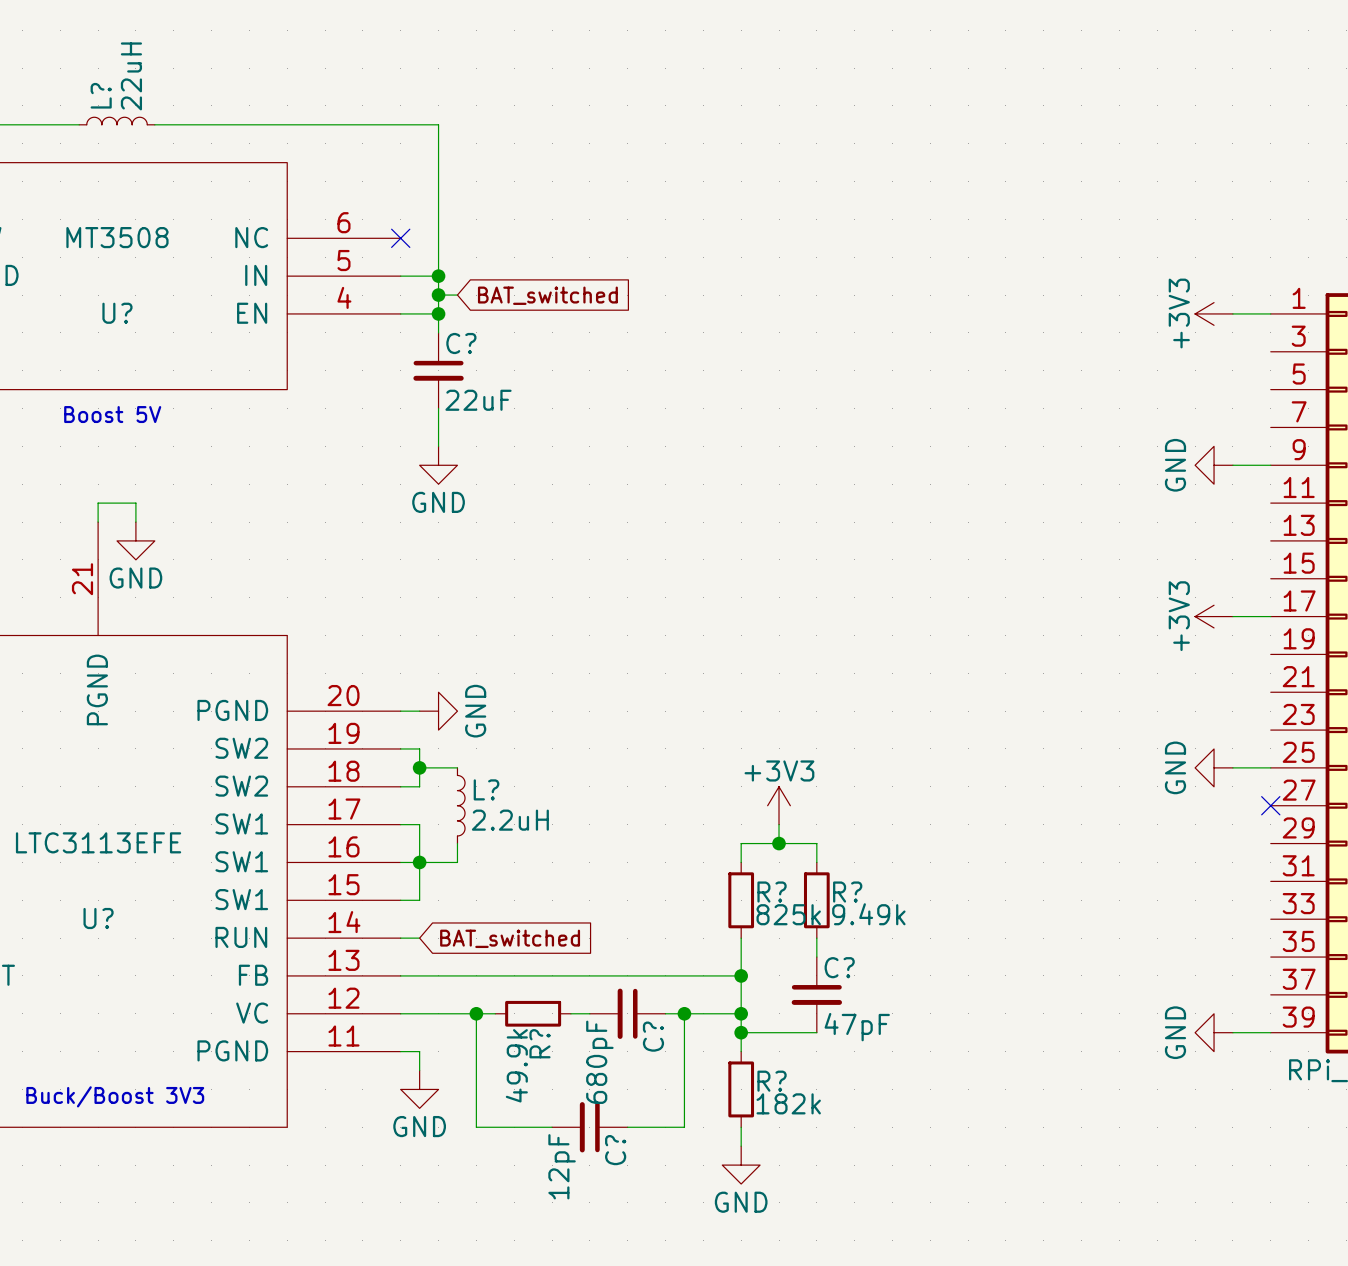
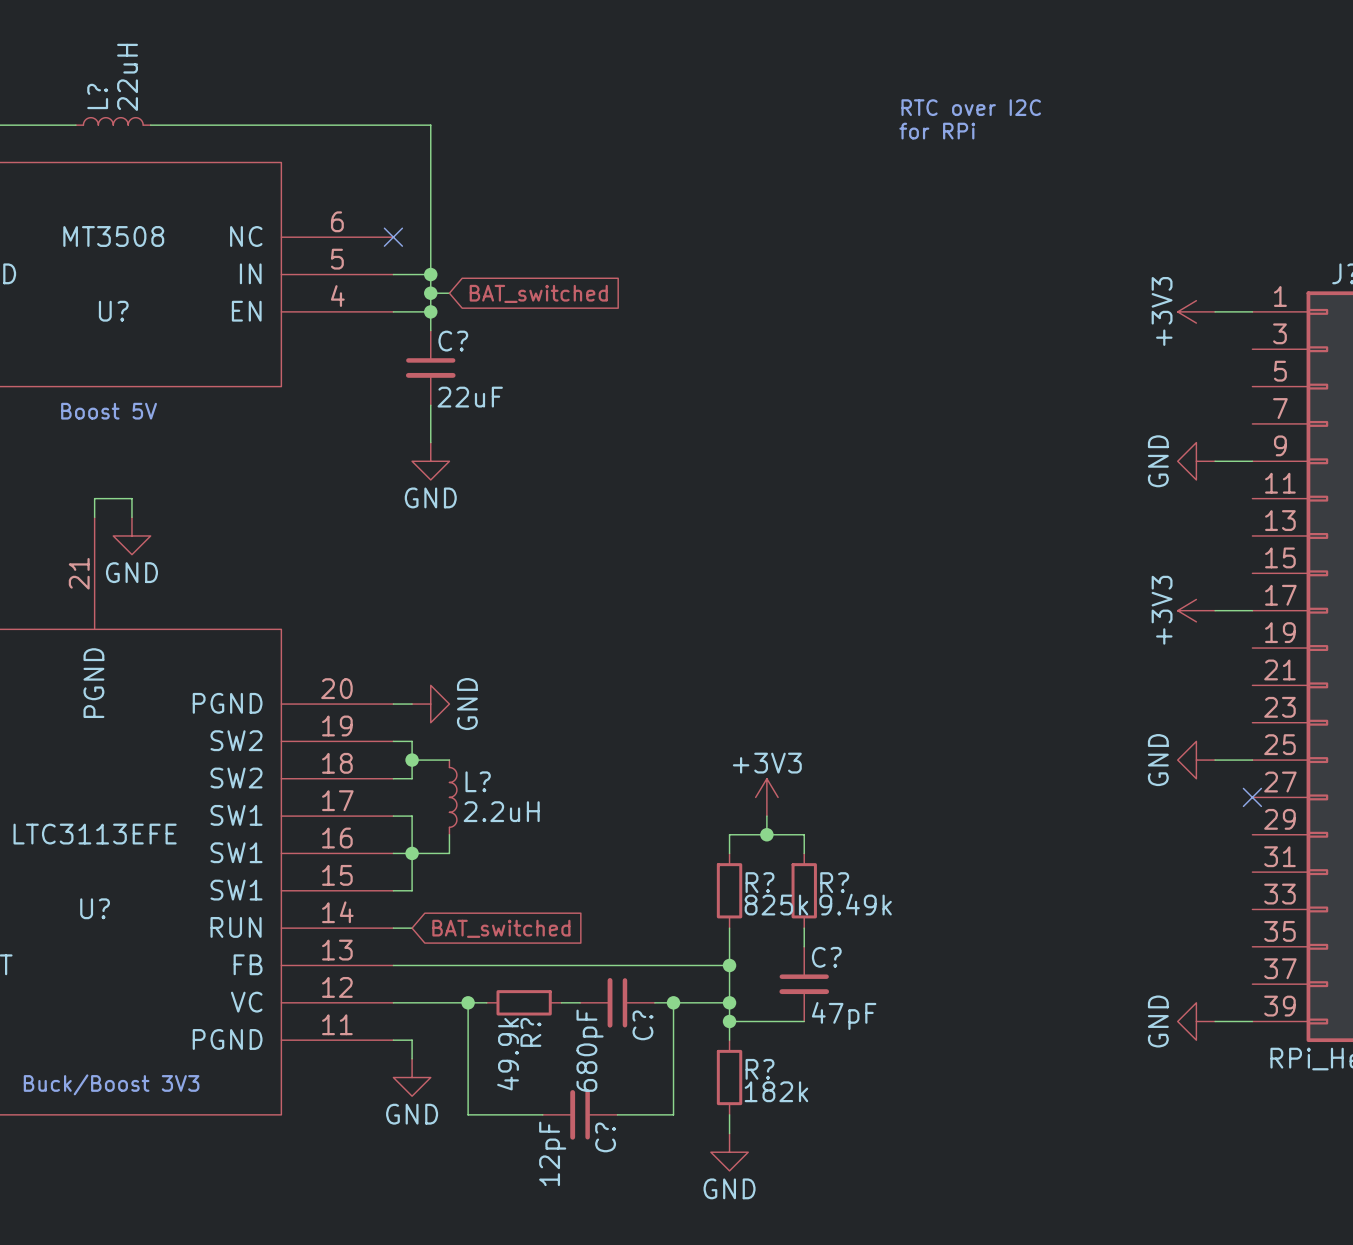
text: none -> RTC over I2C (971, 107)
text: none -> for RPi (937, 131)

